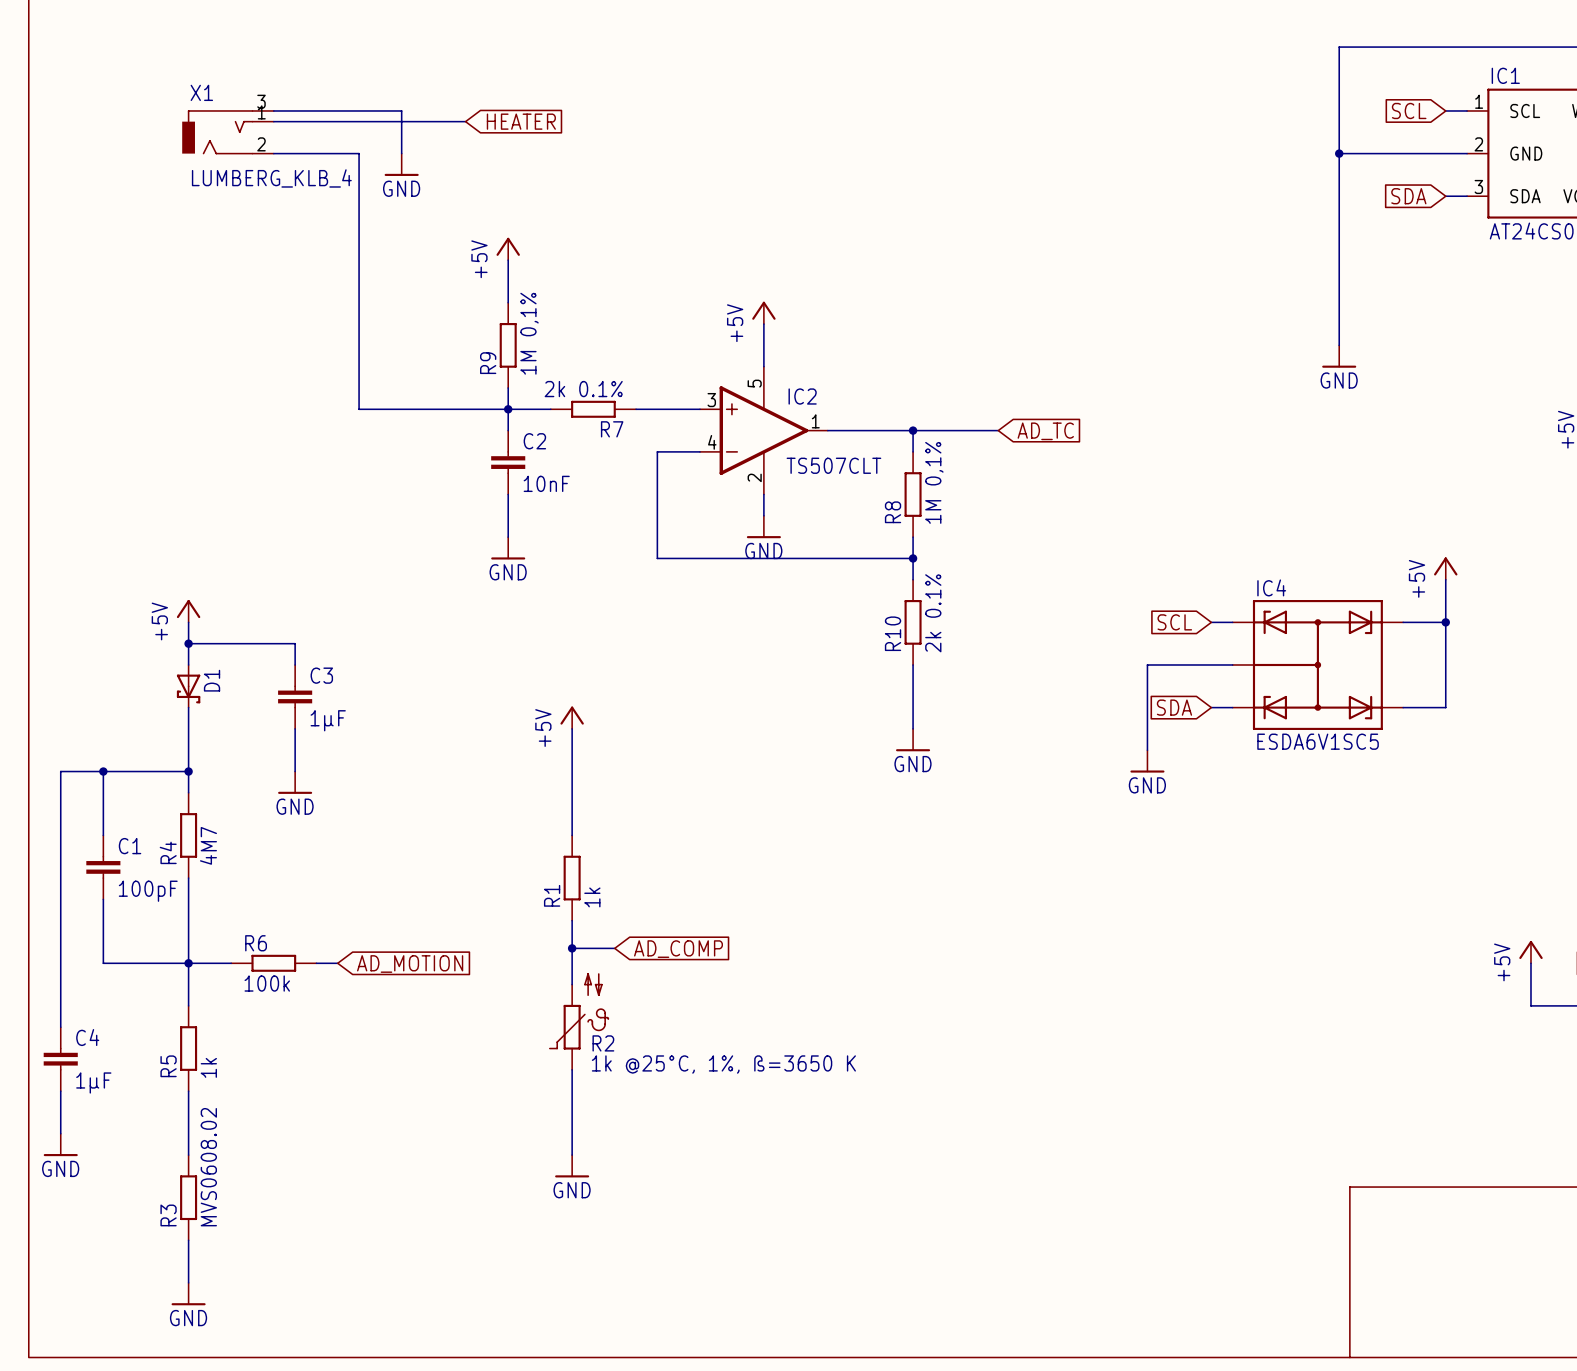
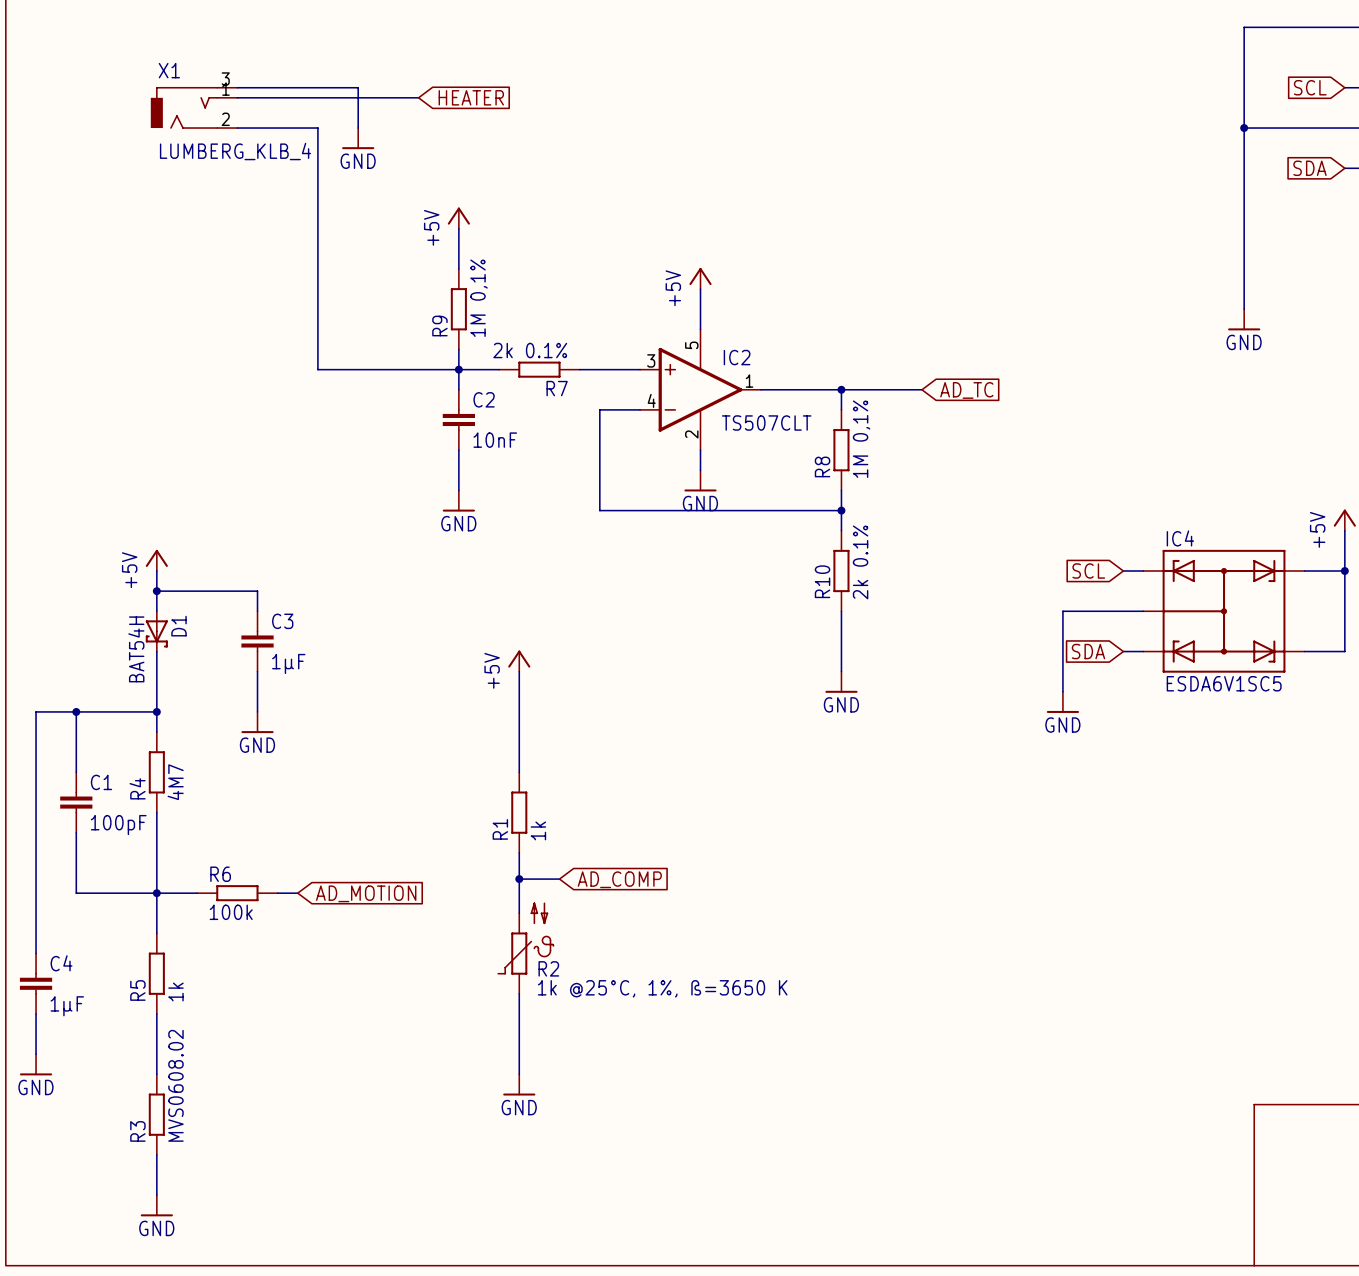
D1 value: none -> BAT54H (136, 649)

